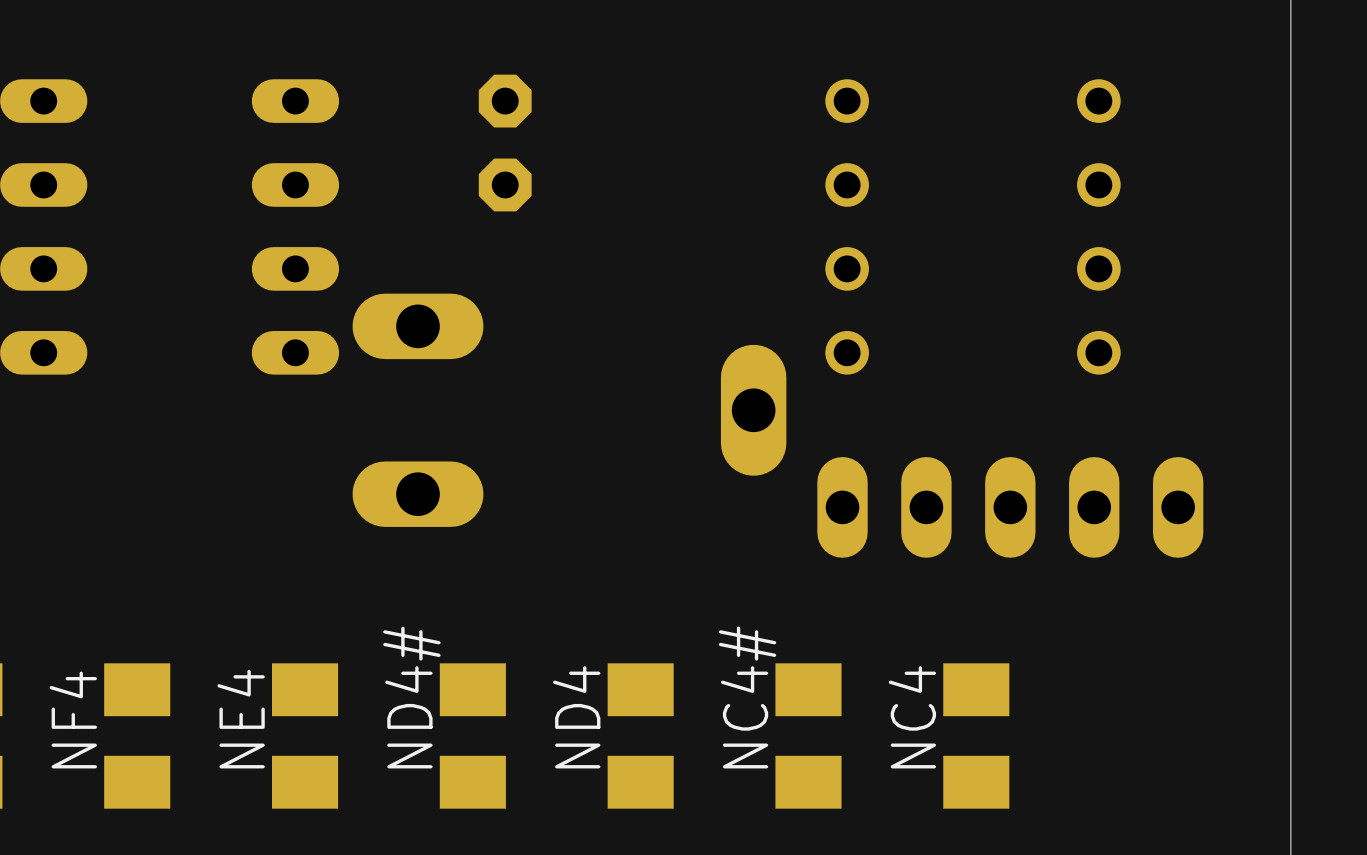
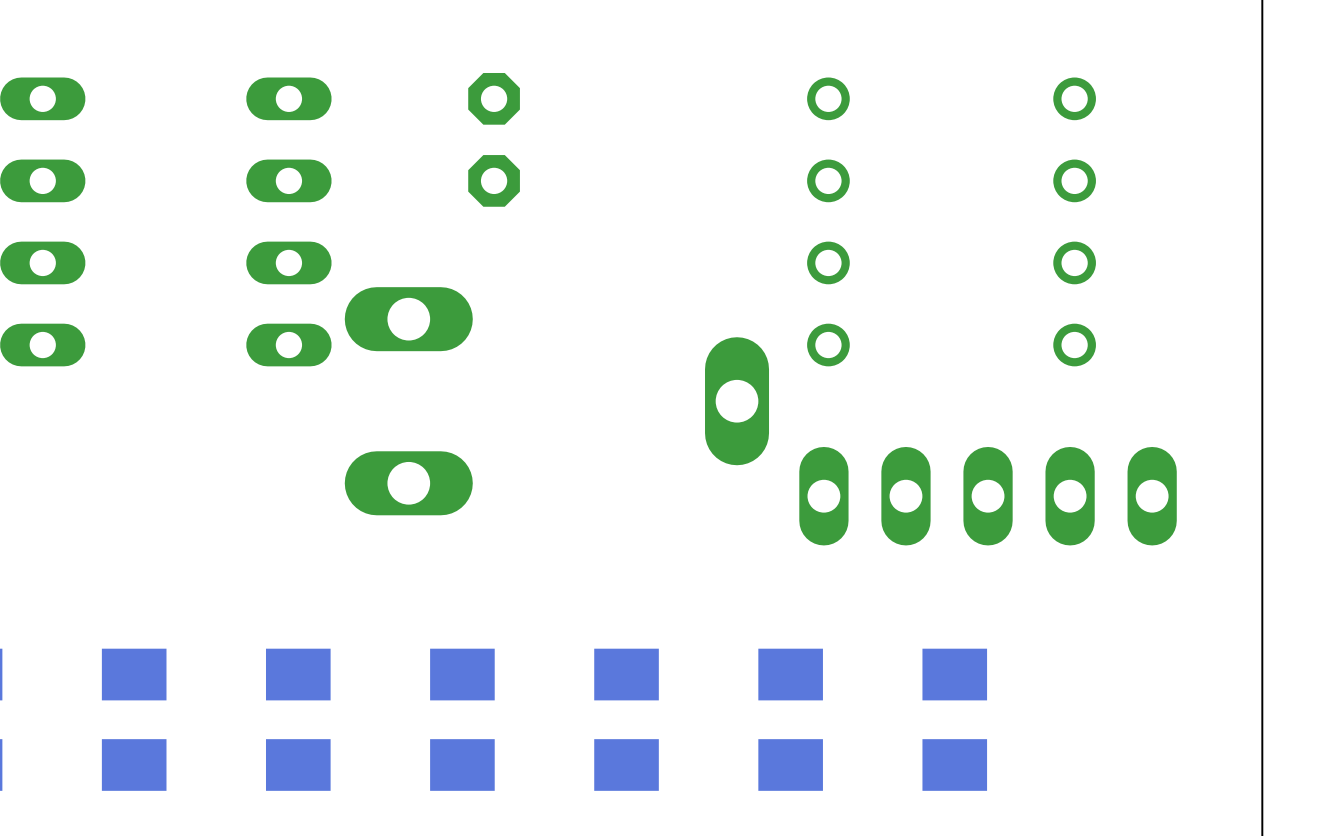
ND4# name: ND4# (411, 697) -> none
NC4# name: NC4# (747, 697) -> none
ND4 name: ND4 (576, 717) -> none
NC4 name: NC4 (912, 717) -> none
NE4 name: NE4 (241, 719) -> none
NF4 name: NF4 (73, 720) -> none

